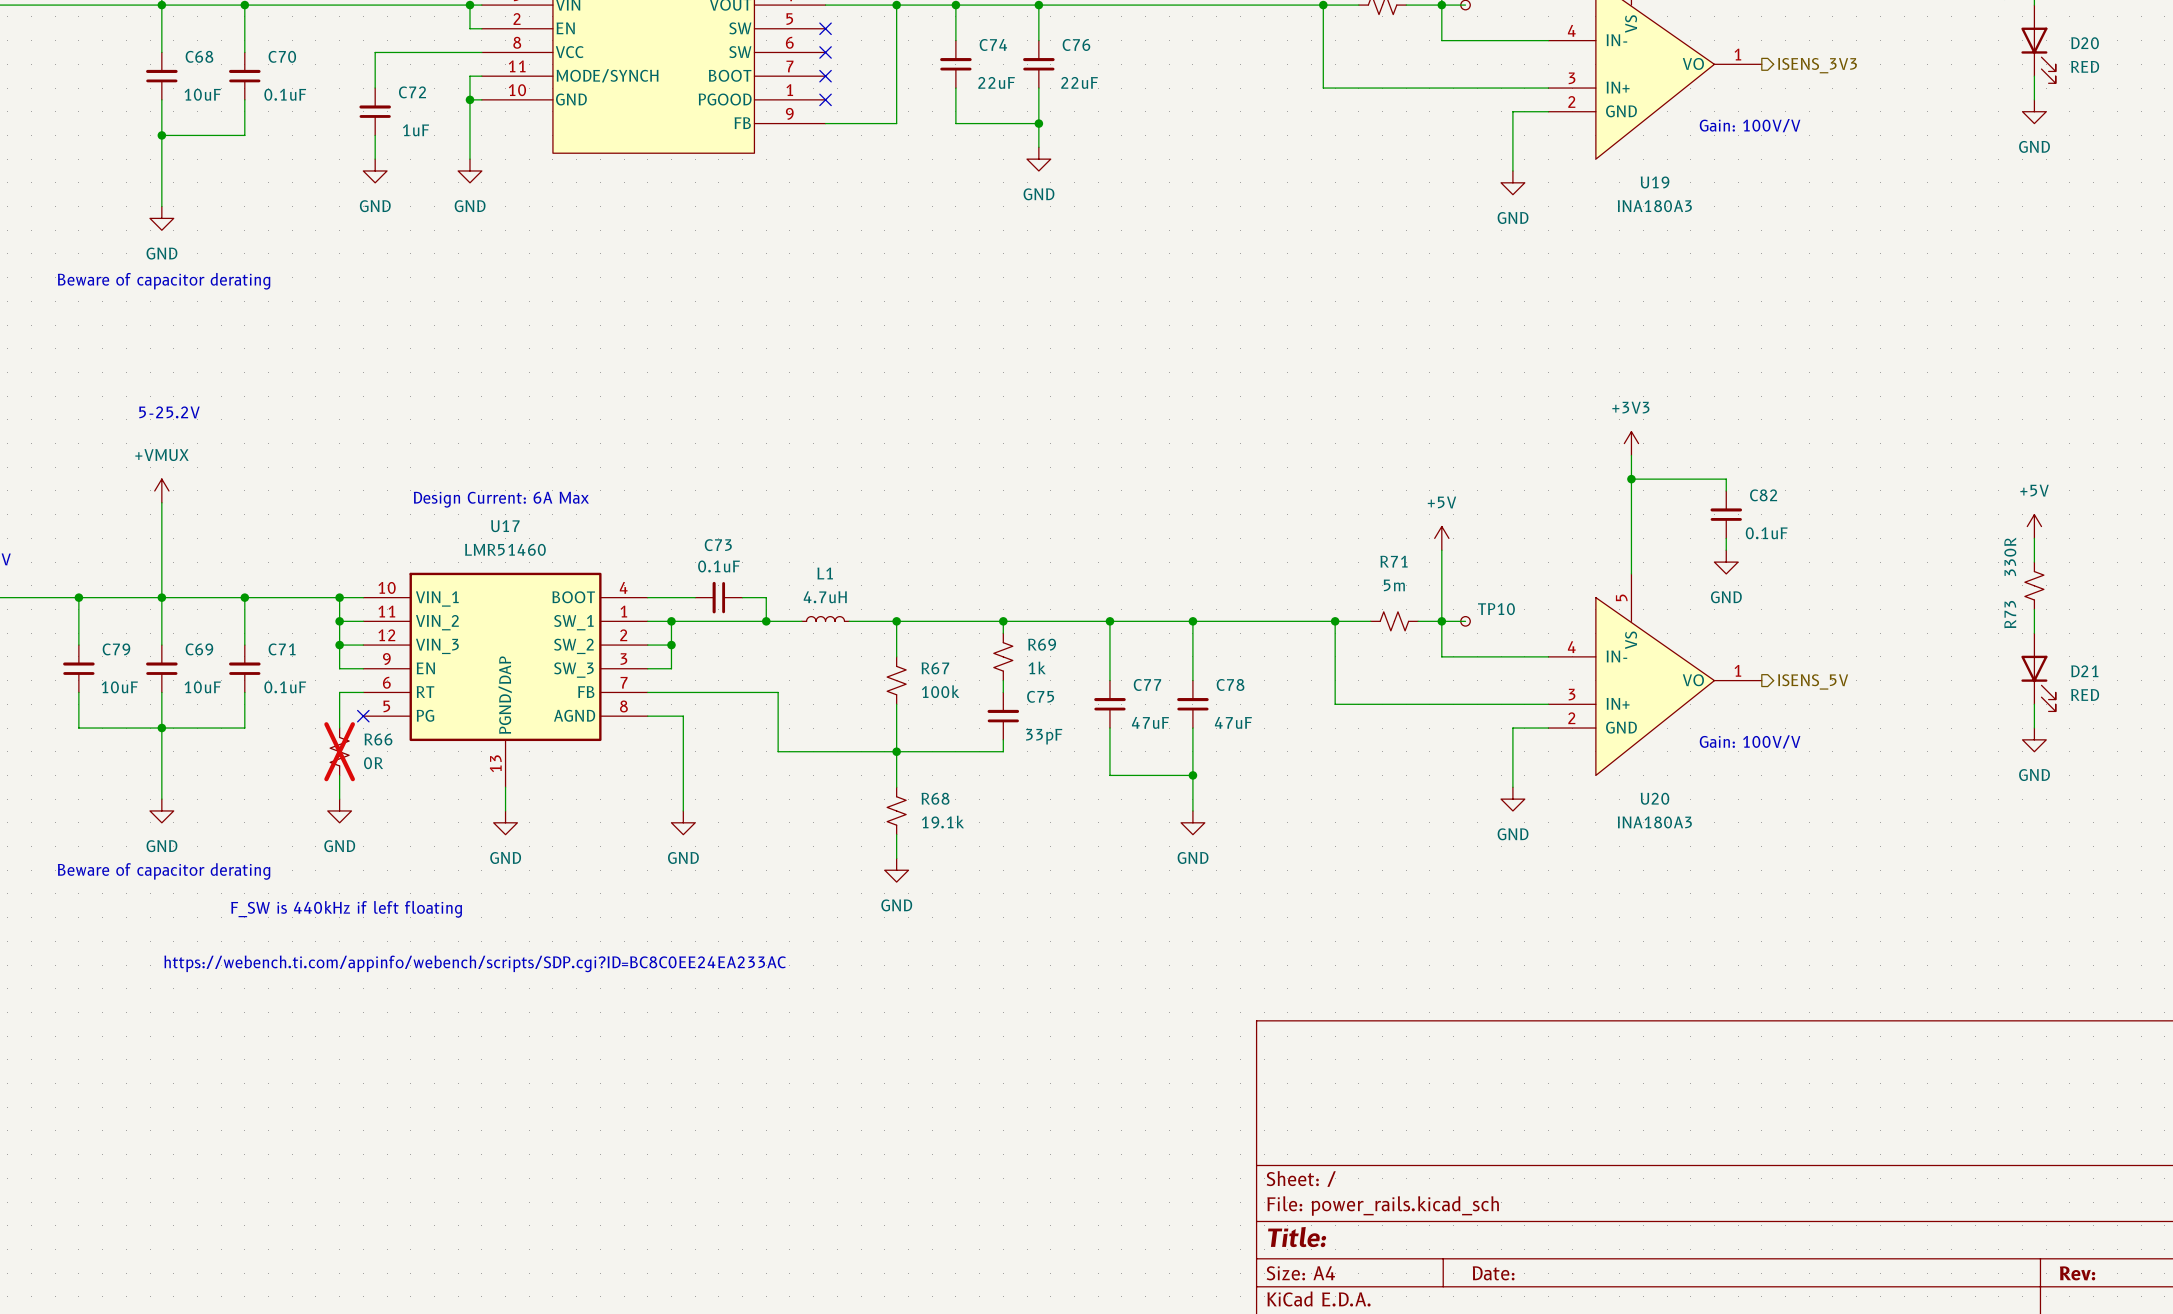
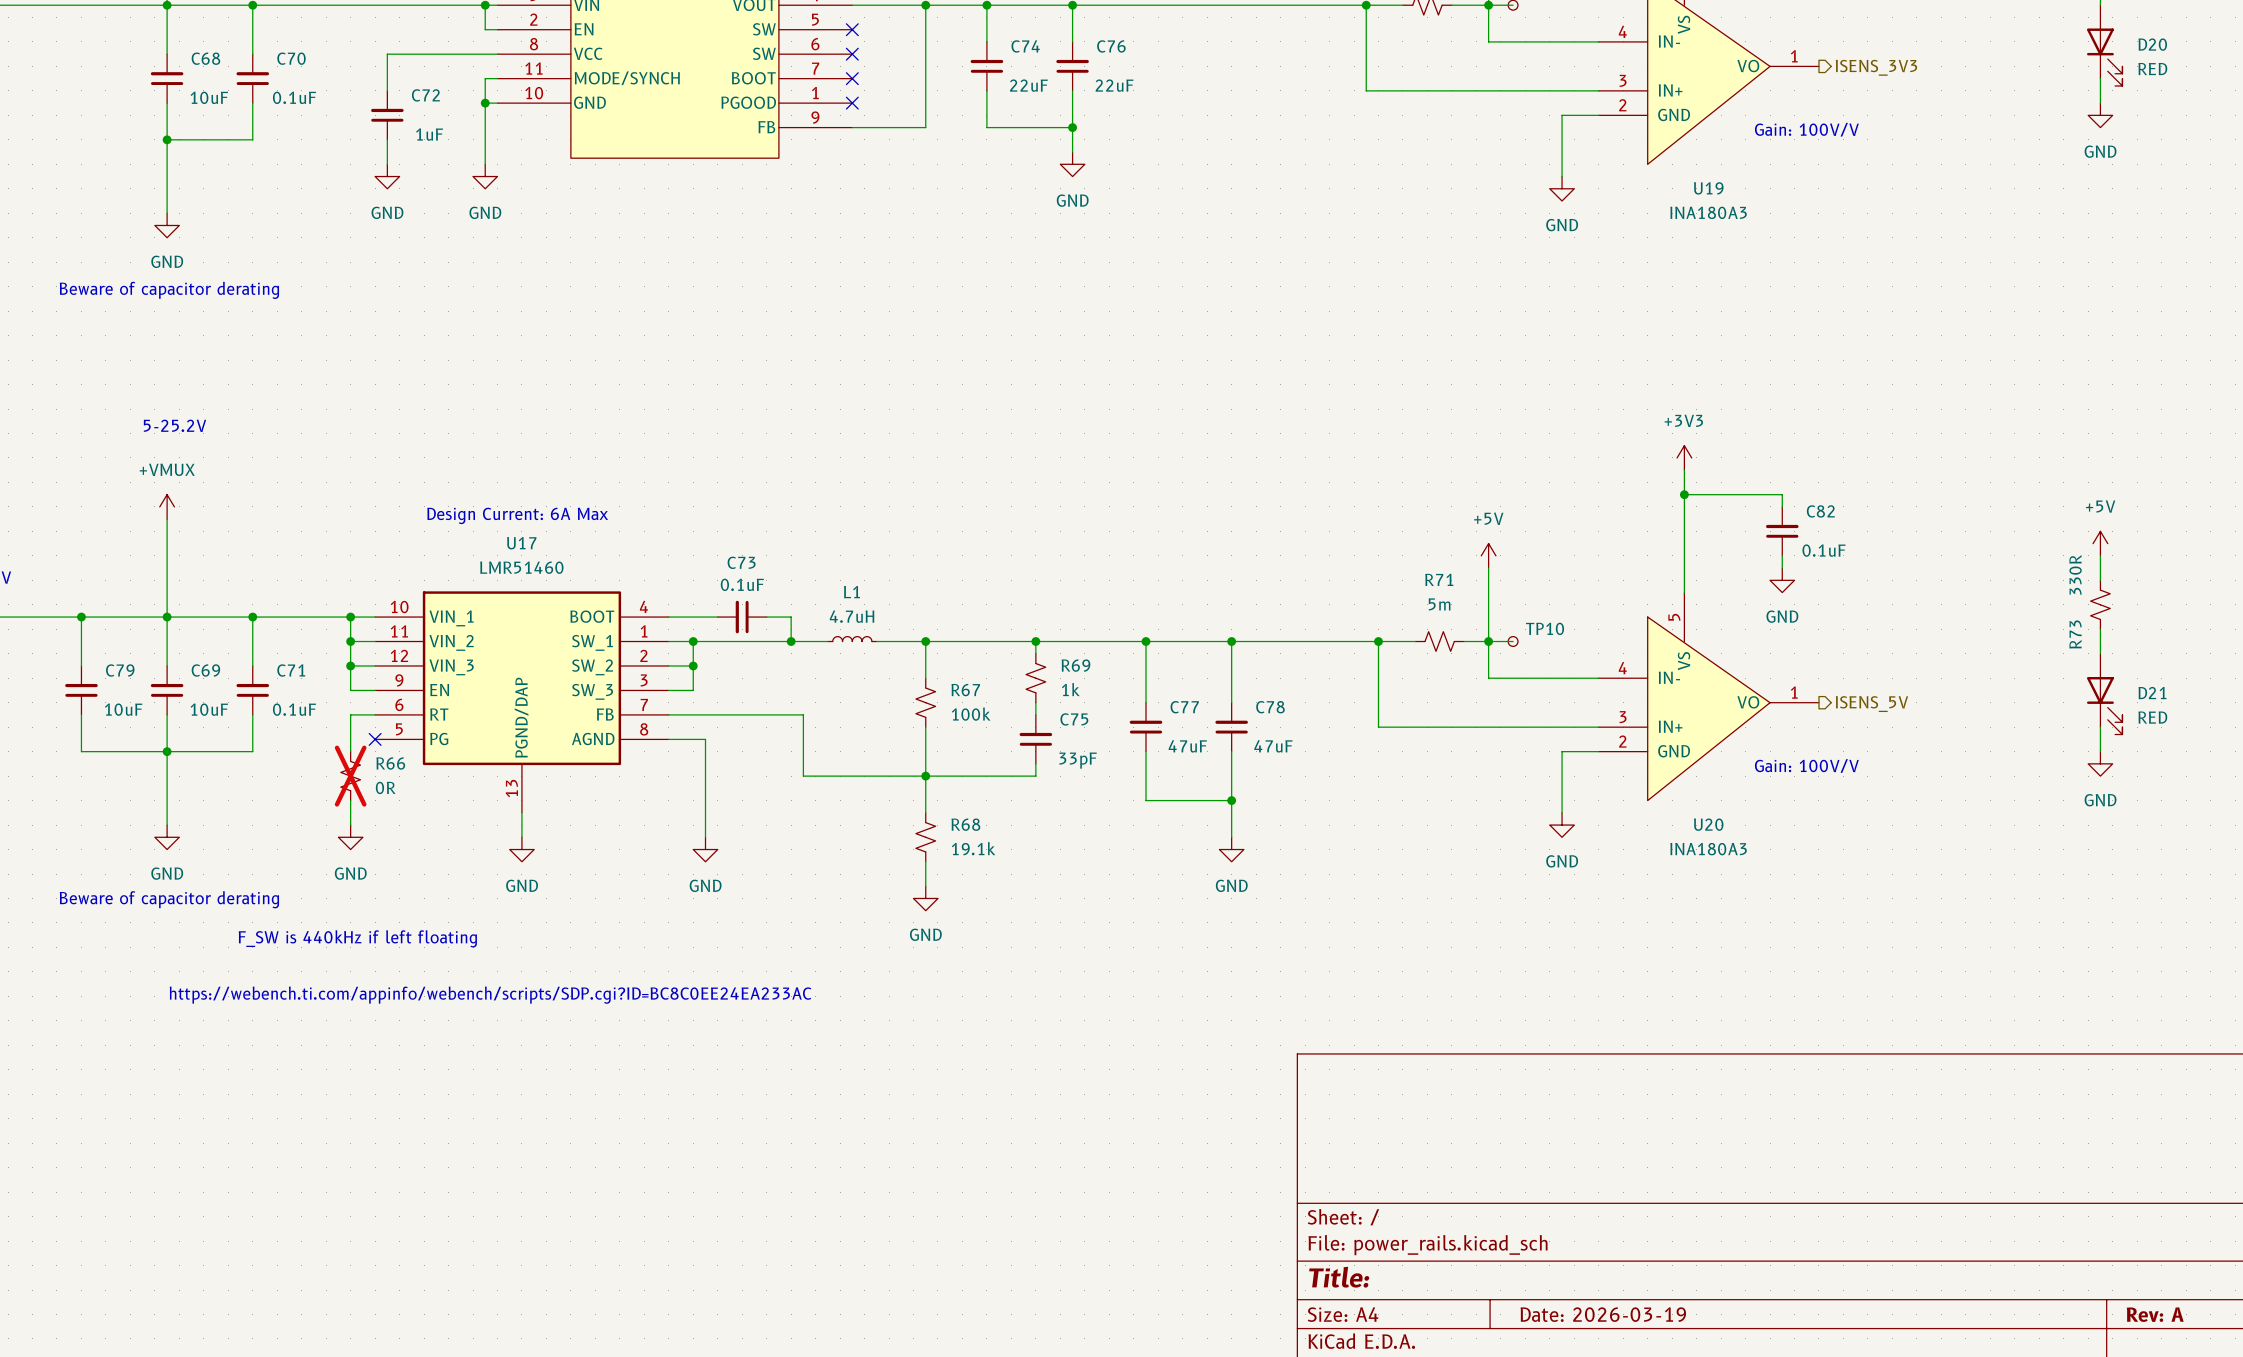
title block: Date: (1493, 1273) -> Date: 2026-03-19 (1603, 1314)
title block: Rev: (2077, 1273) -> Rev: A (2155, 1314)

